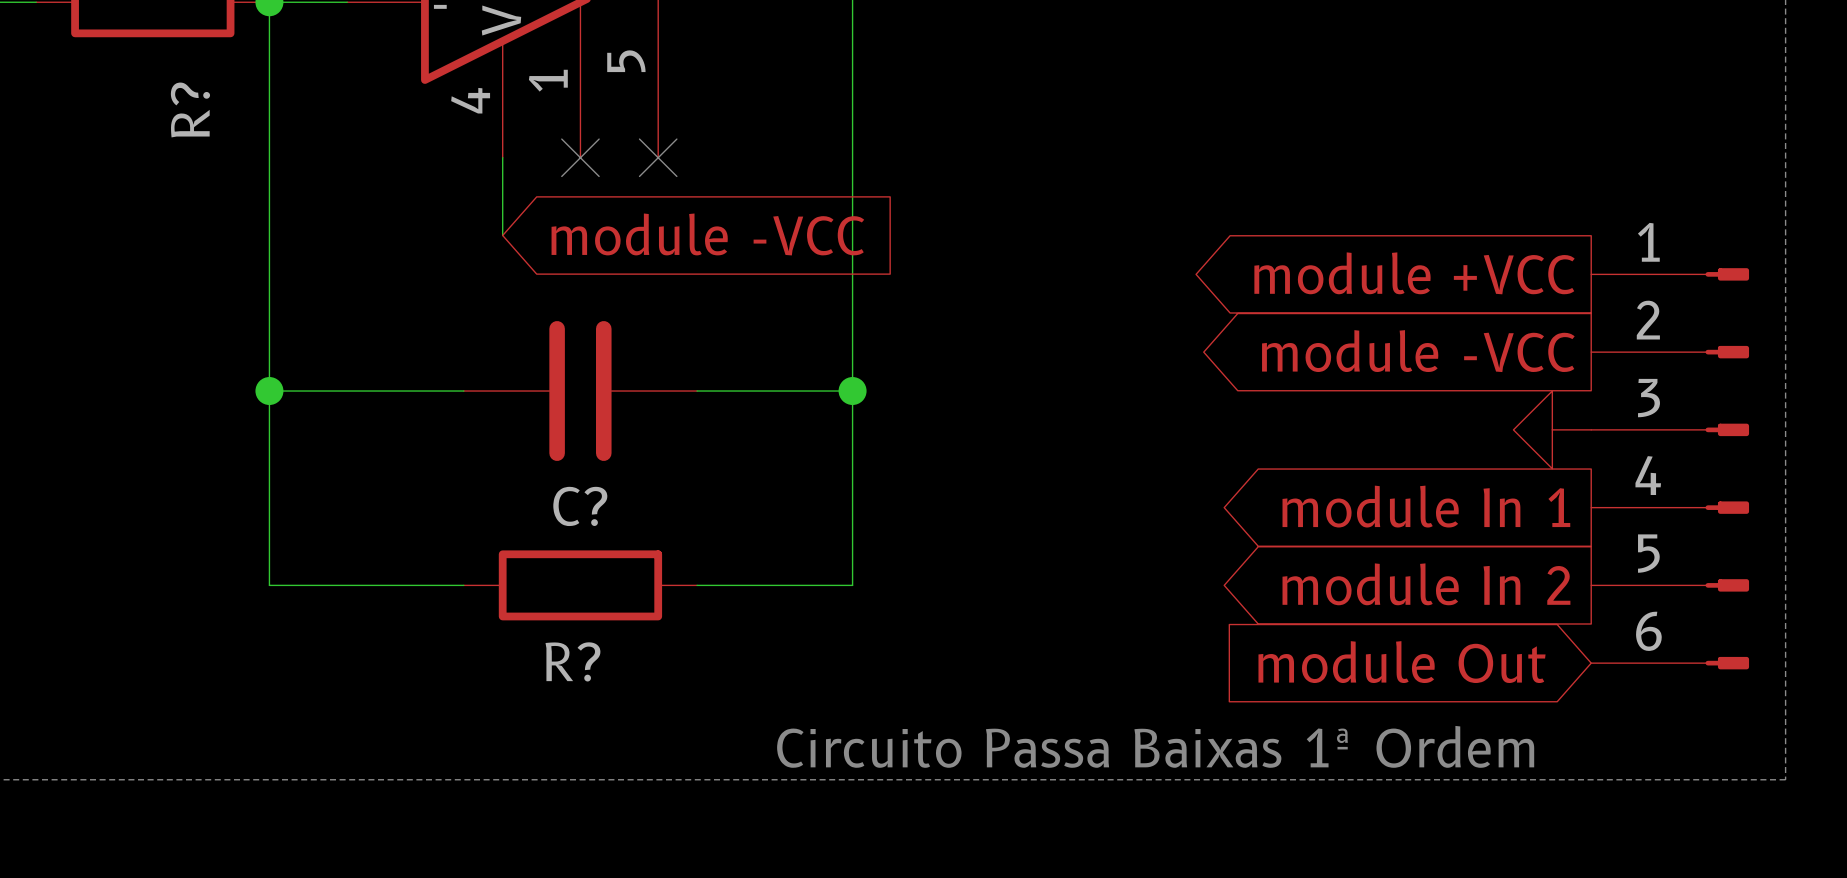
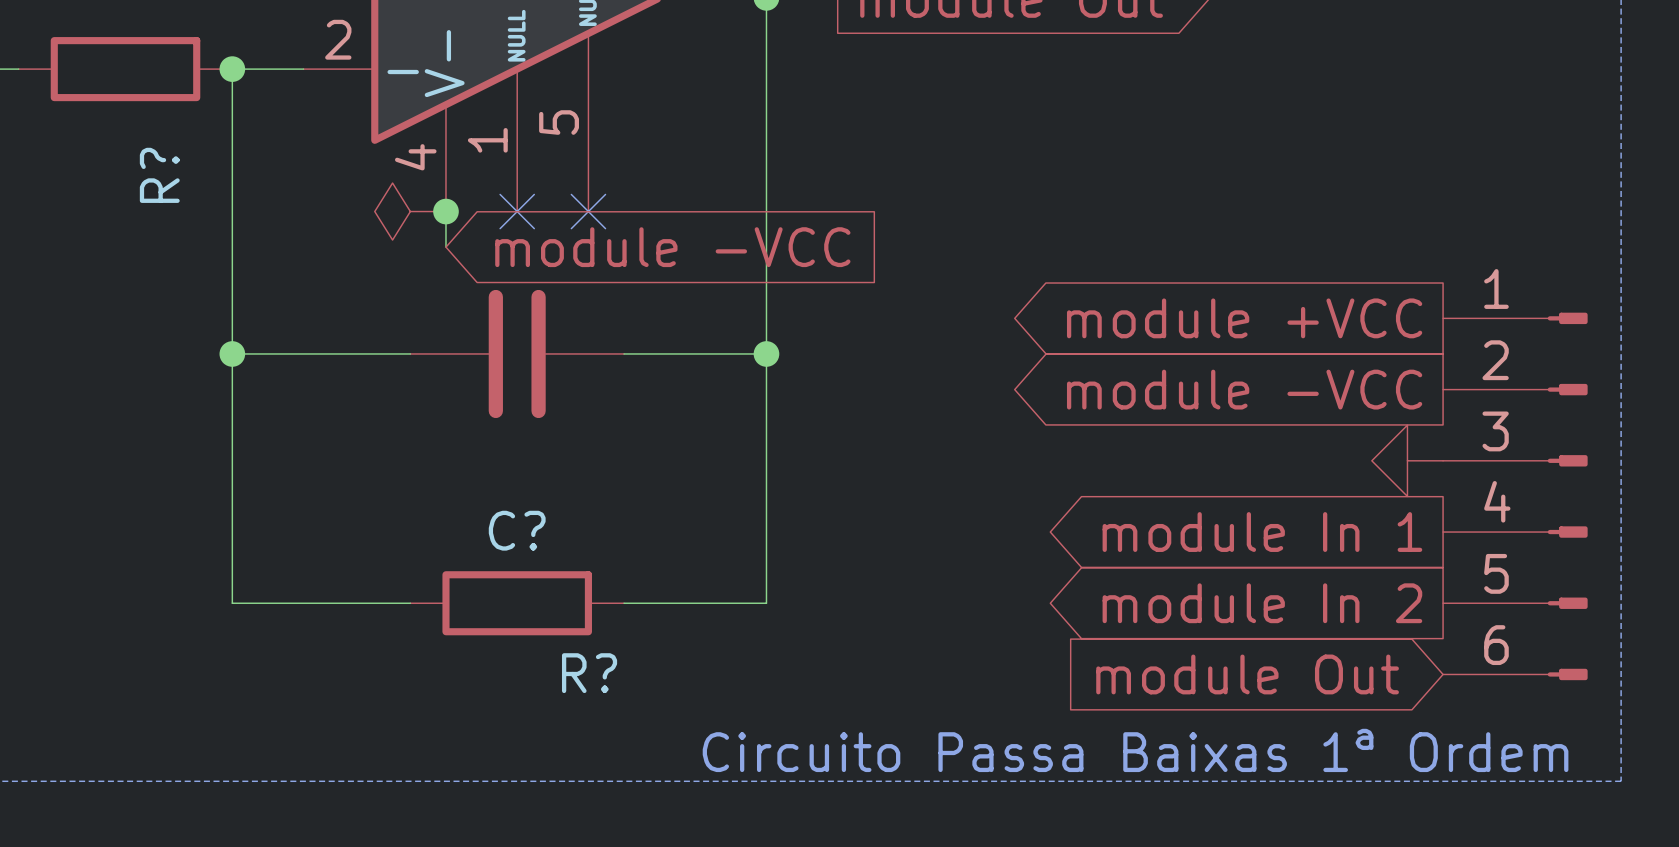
power symbol: none -> (410, 211)
junction: none -> (445, 211)
wire: (502, 196) (502, 235) -> none
global label position: module -VCC (707, 234) -> module -VCC (672, 247)
wire: (269, 391) (463, 391) -> (232, 353) (410, 353)
junction position: (269, 391) -> (232, 353)
C? position: (580, 391) -> (517, 353)
wire: (697, 391) (852, 391) -> (624, 353) (766, 353)
junction position: (852, 391) -> (766, 353)
R? name position: R? (572, 661) -> R? (589, 673)

